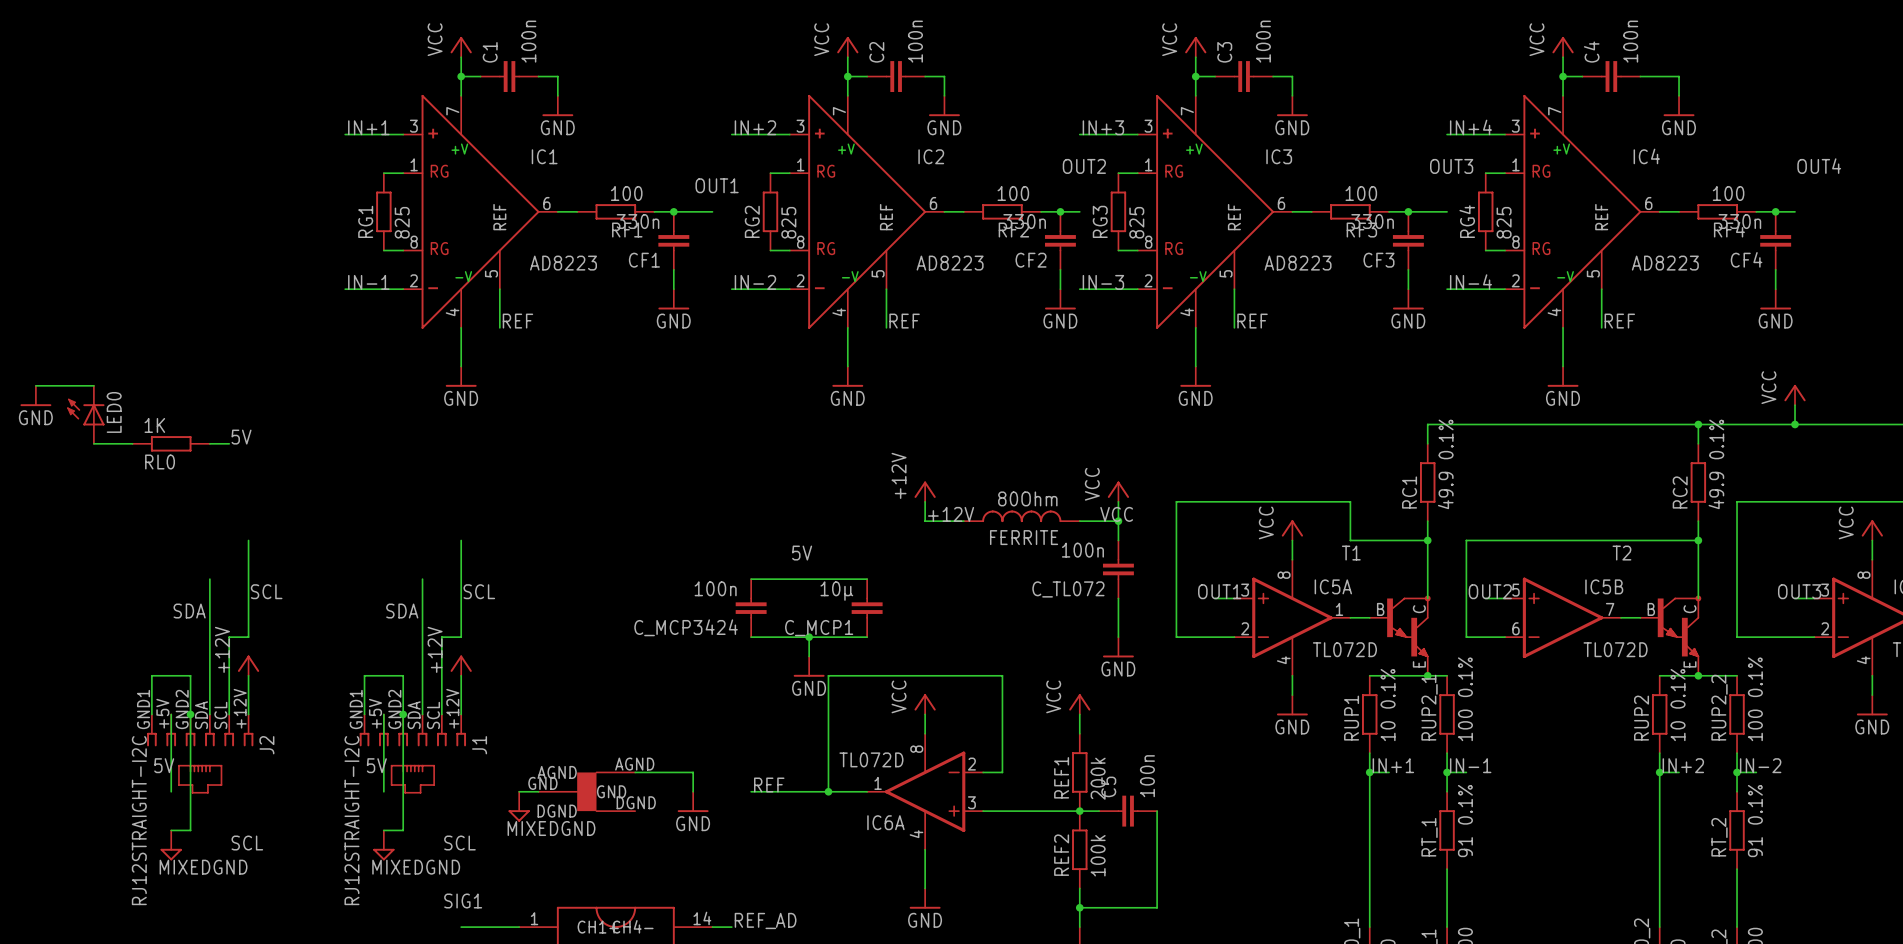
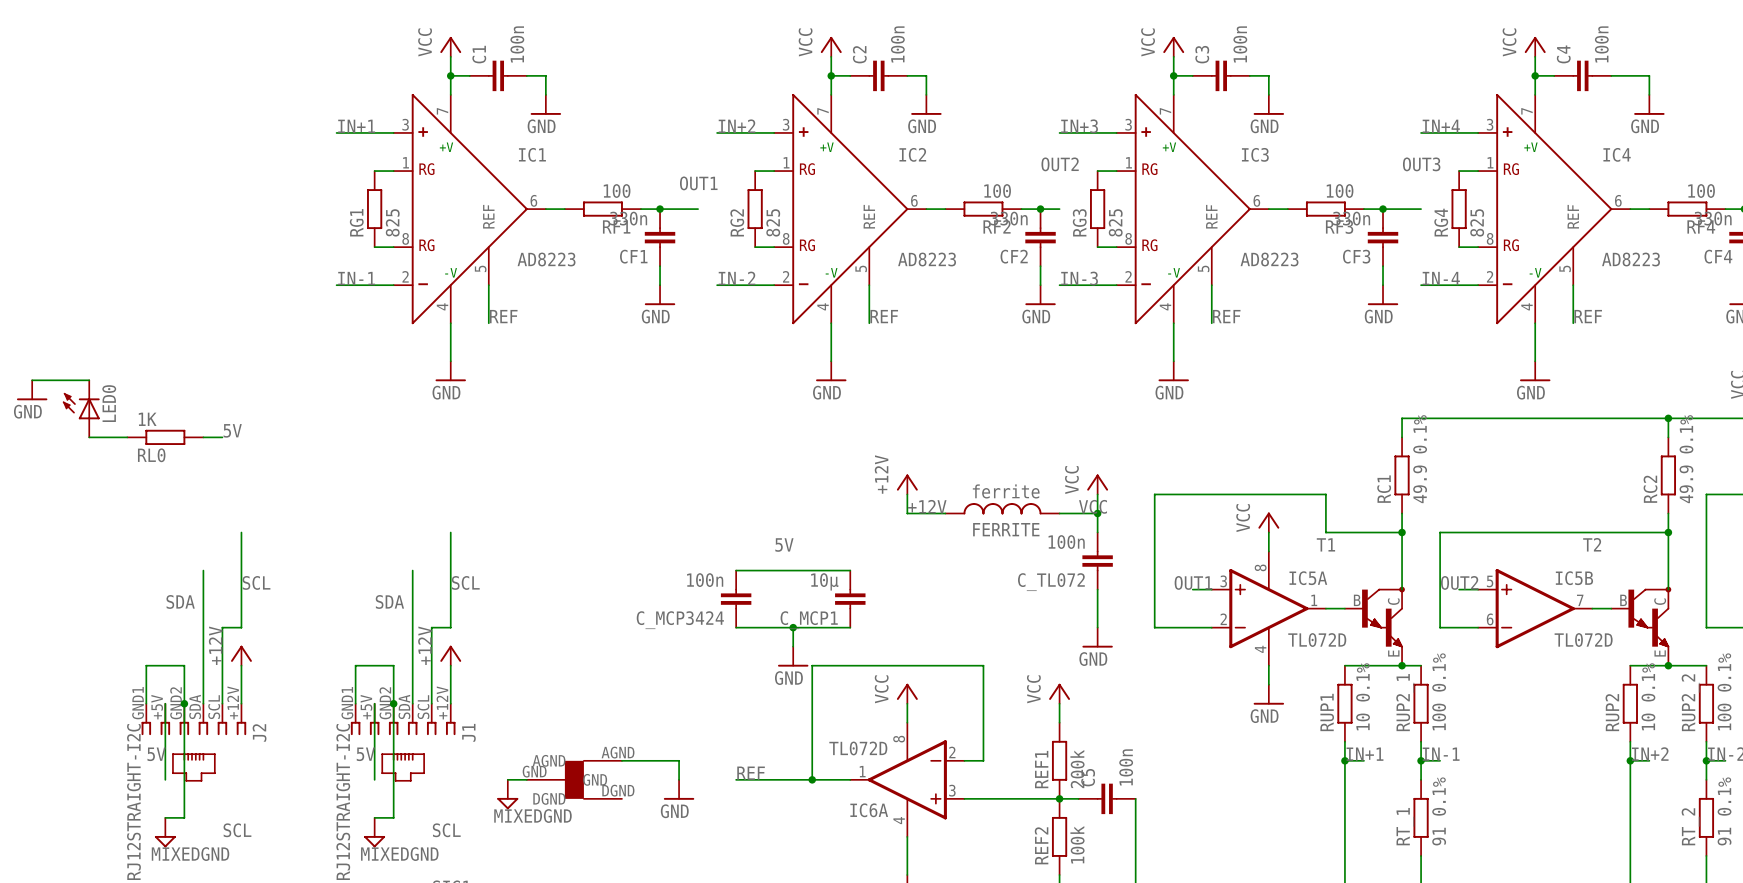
FERRITE value: 80Ohm (1027, 498) -> ferrite (1006, 491)

